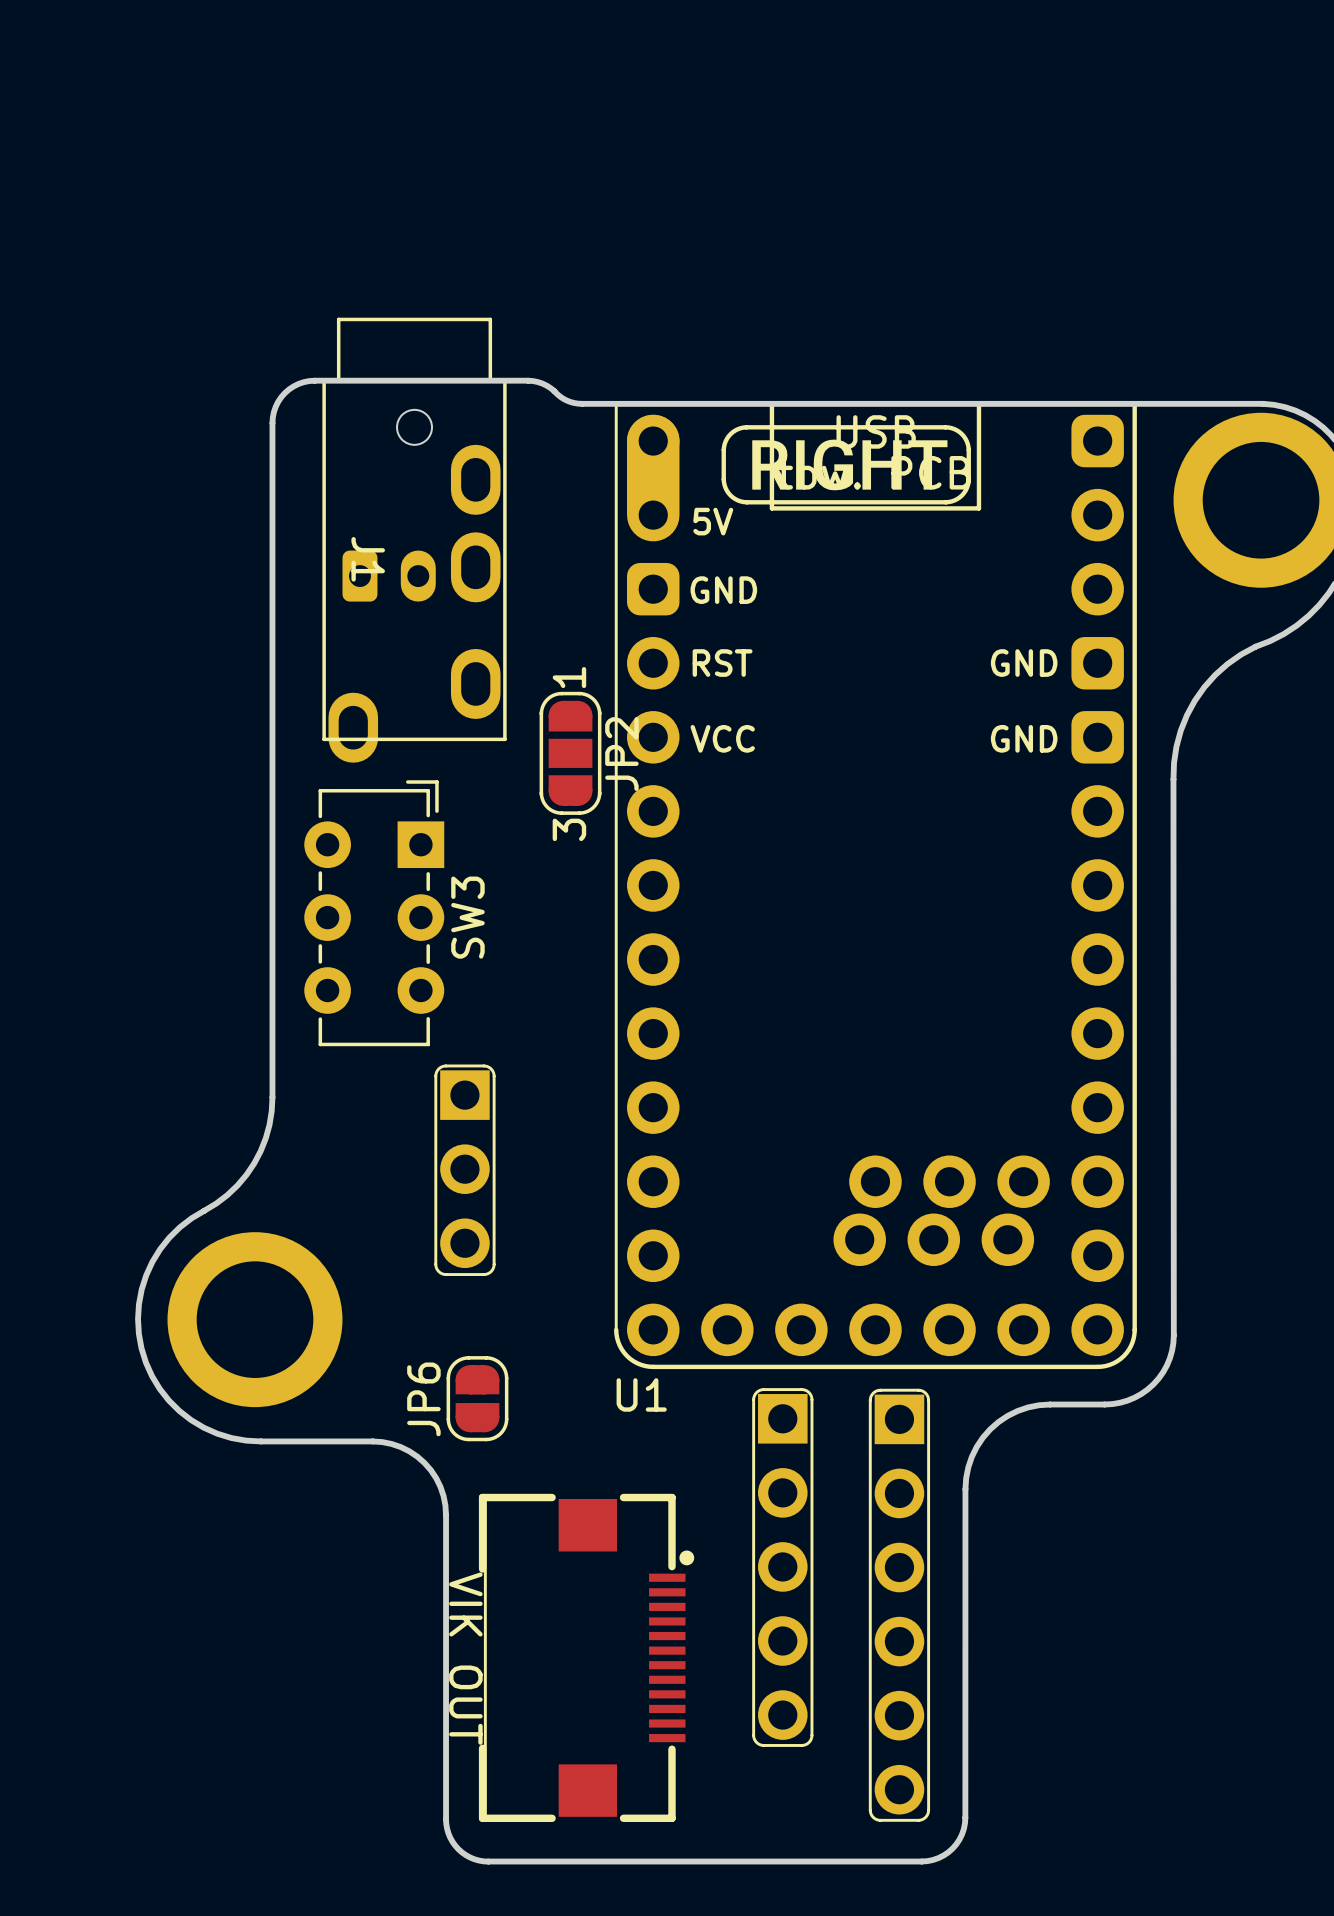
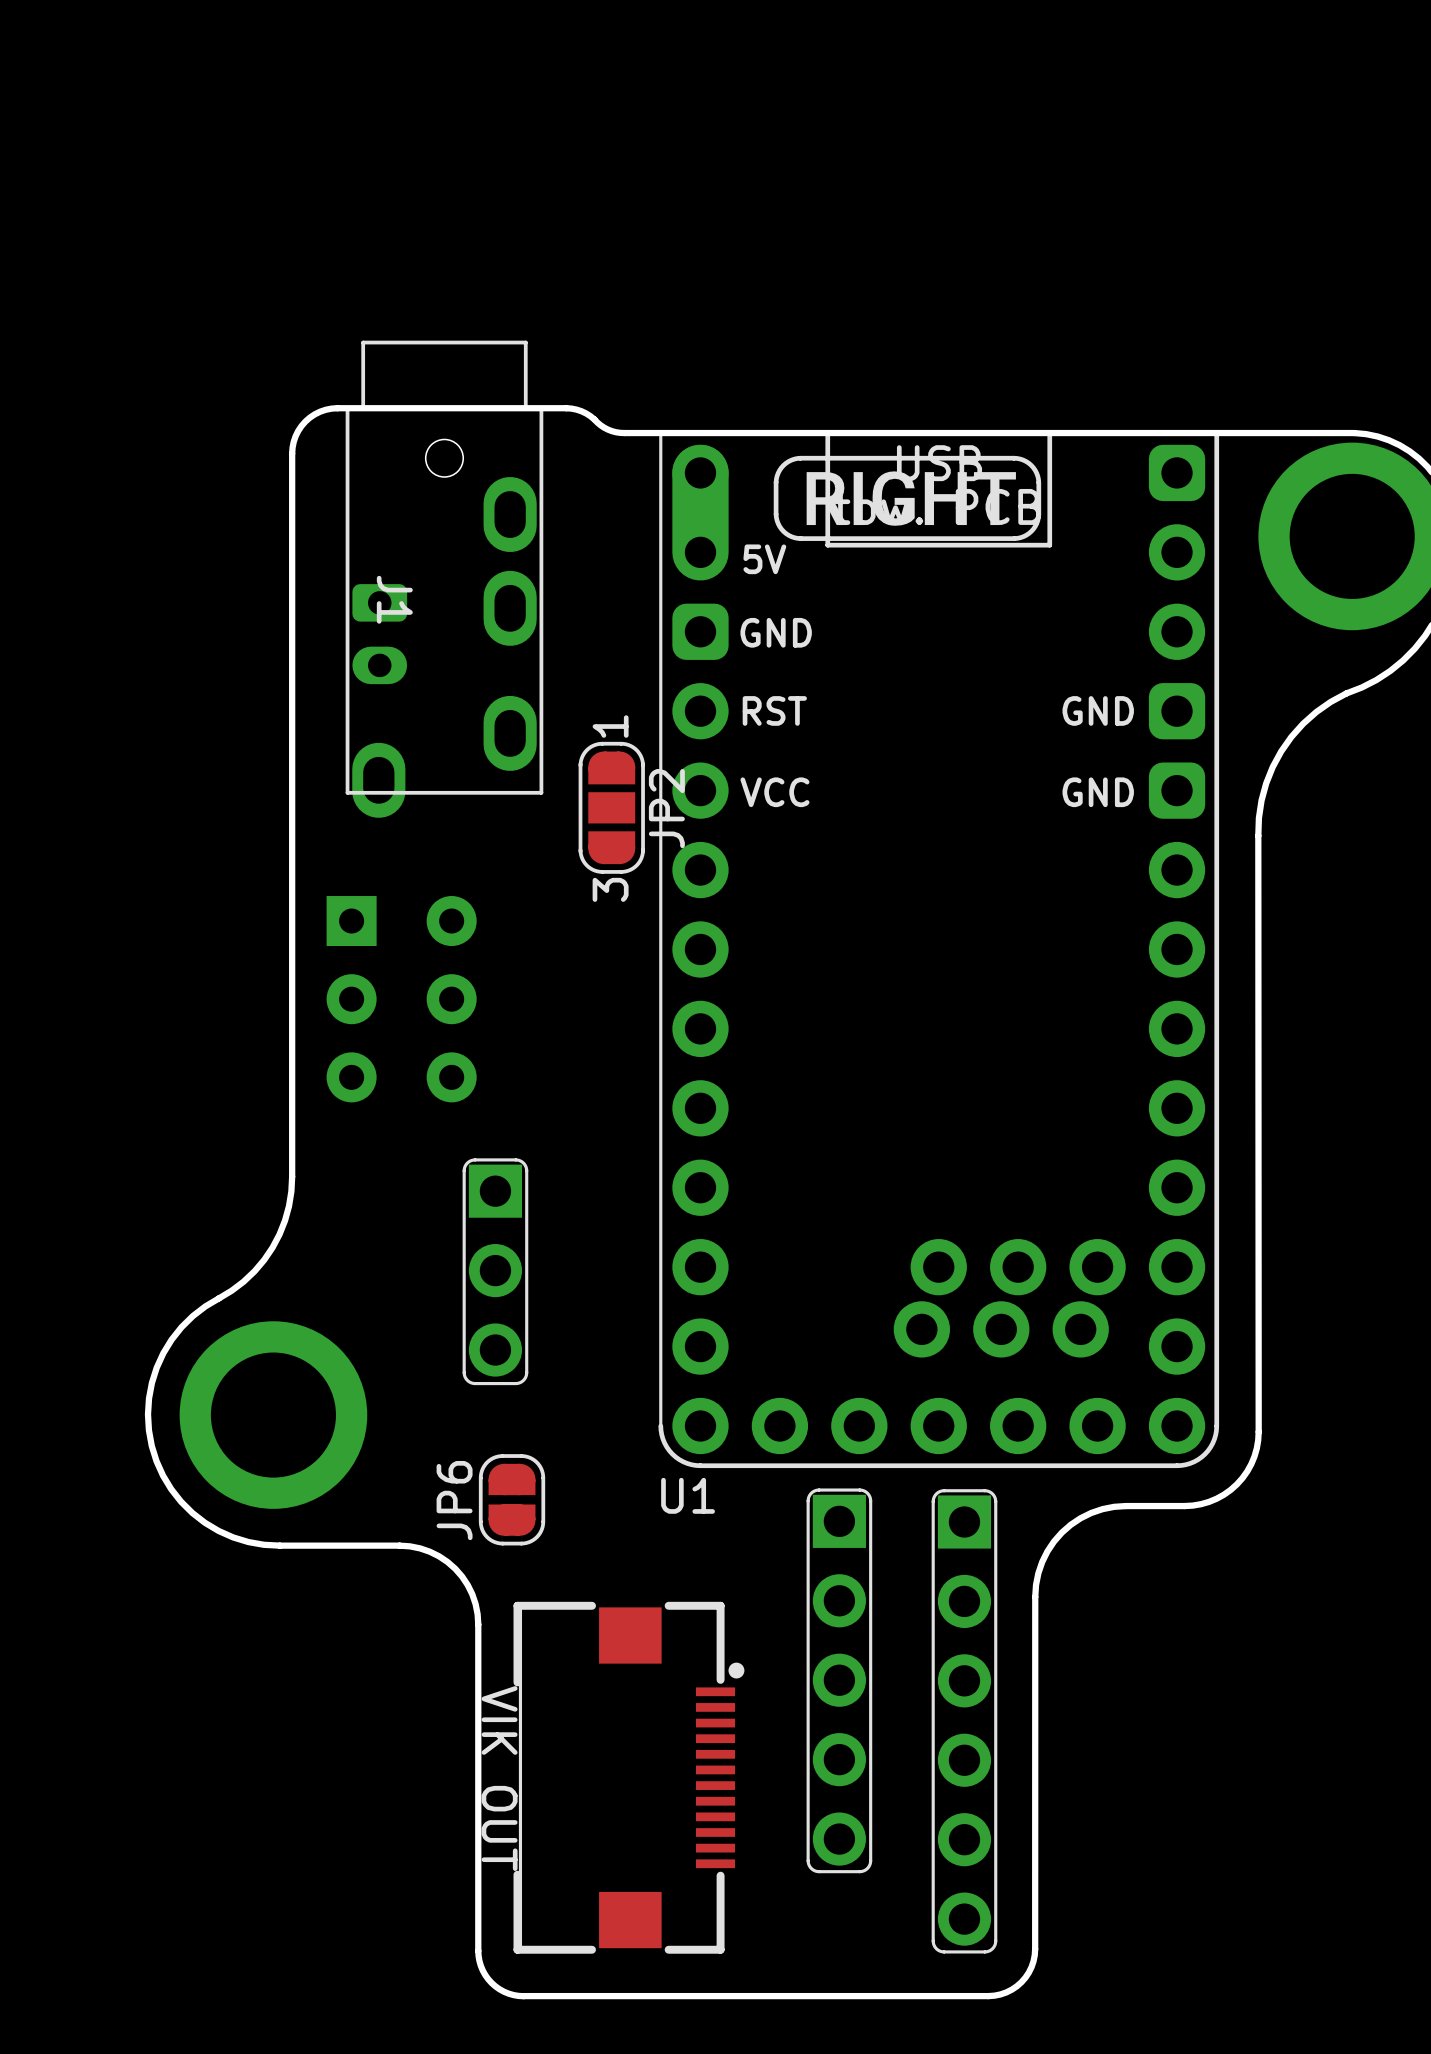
part rotation: 0° (389, 576) -> 90° clockwise (379, 634)
SW3 side: top (374, 913) -> bottom (401, 999)
part side: bottom (464, 1170) -> top (495, 1271)

